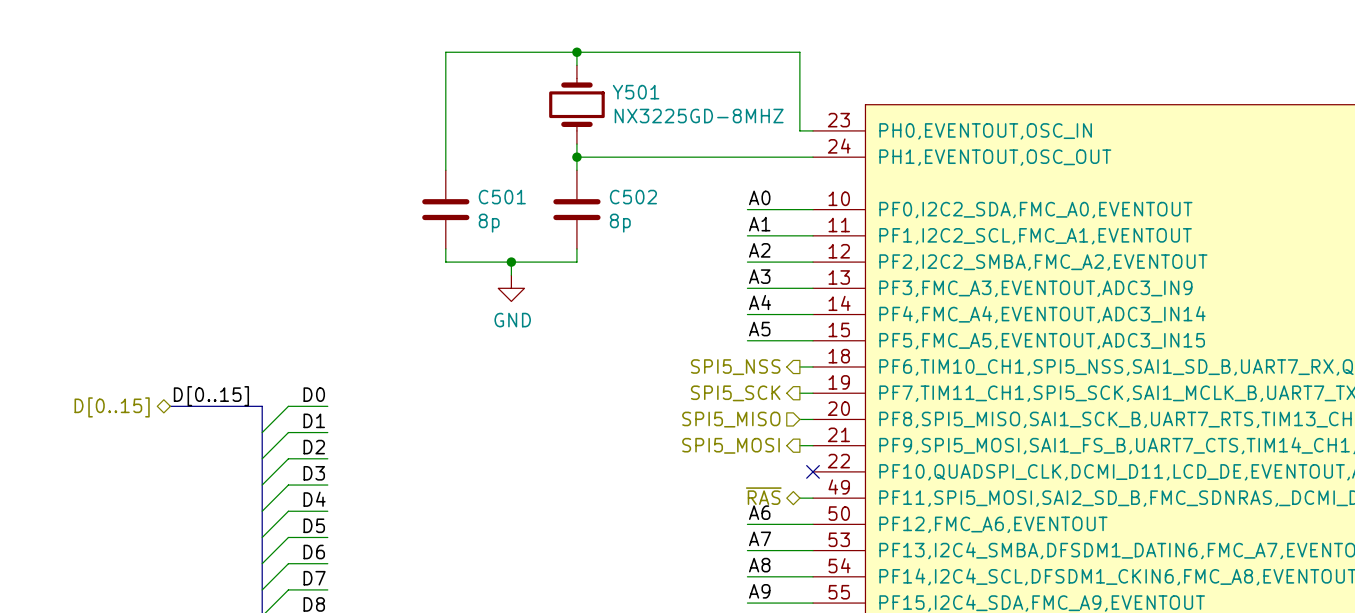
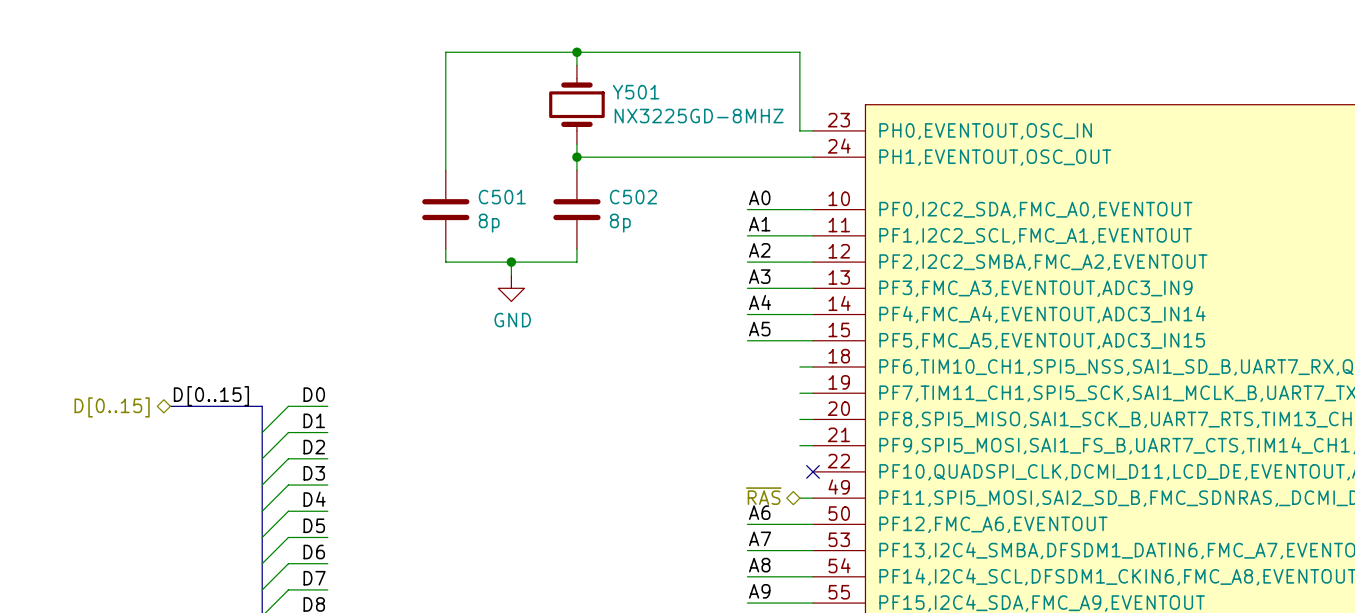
hierarchical label: SPI5_NSS (735, 367) -> none
hierarchical label: SPI5_SCK (735, 393) -> none
hierarchical label: SPI5_MISO (731, 419) -> none
hierarchical label: SPI5_MOSI (730, 445) -> none

